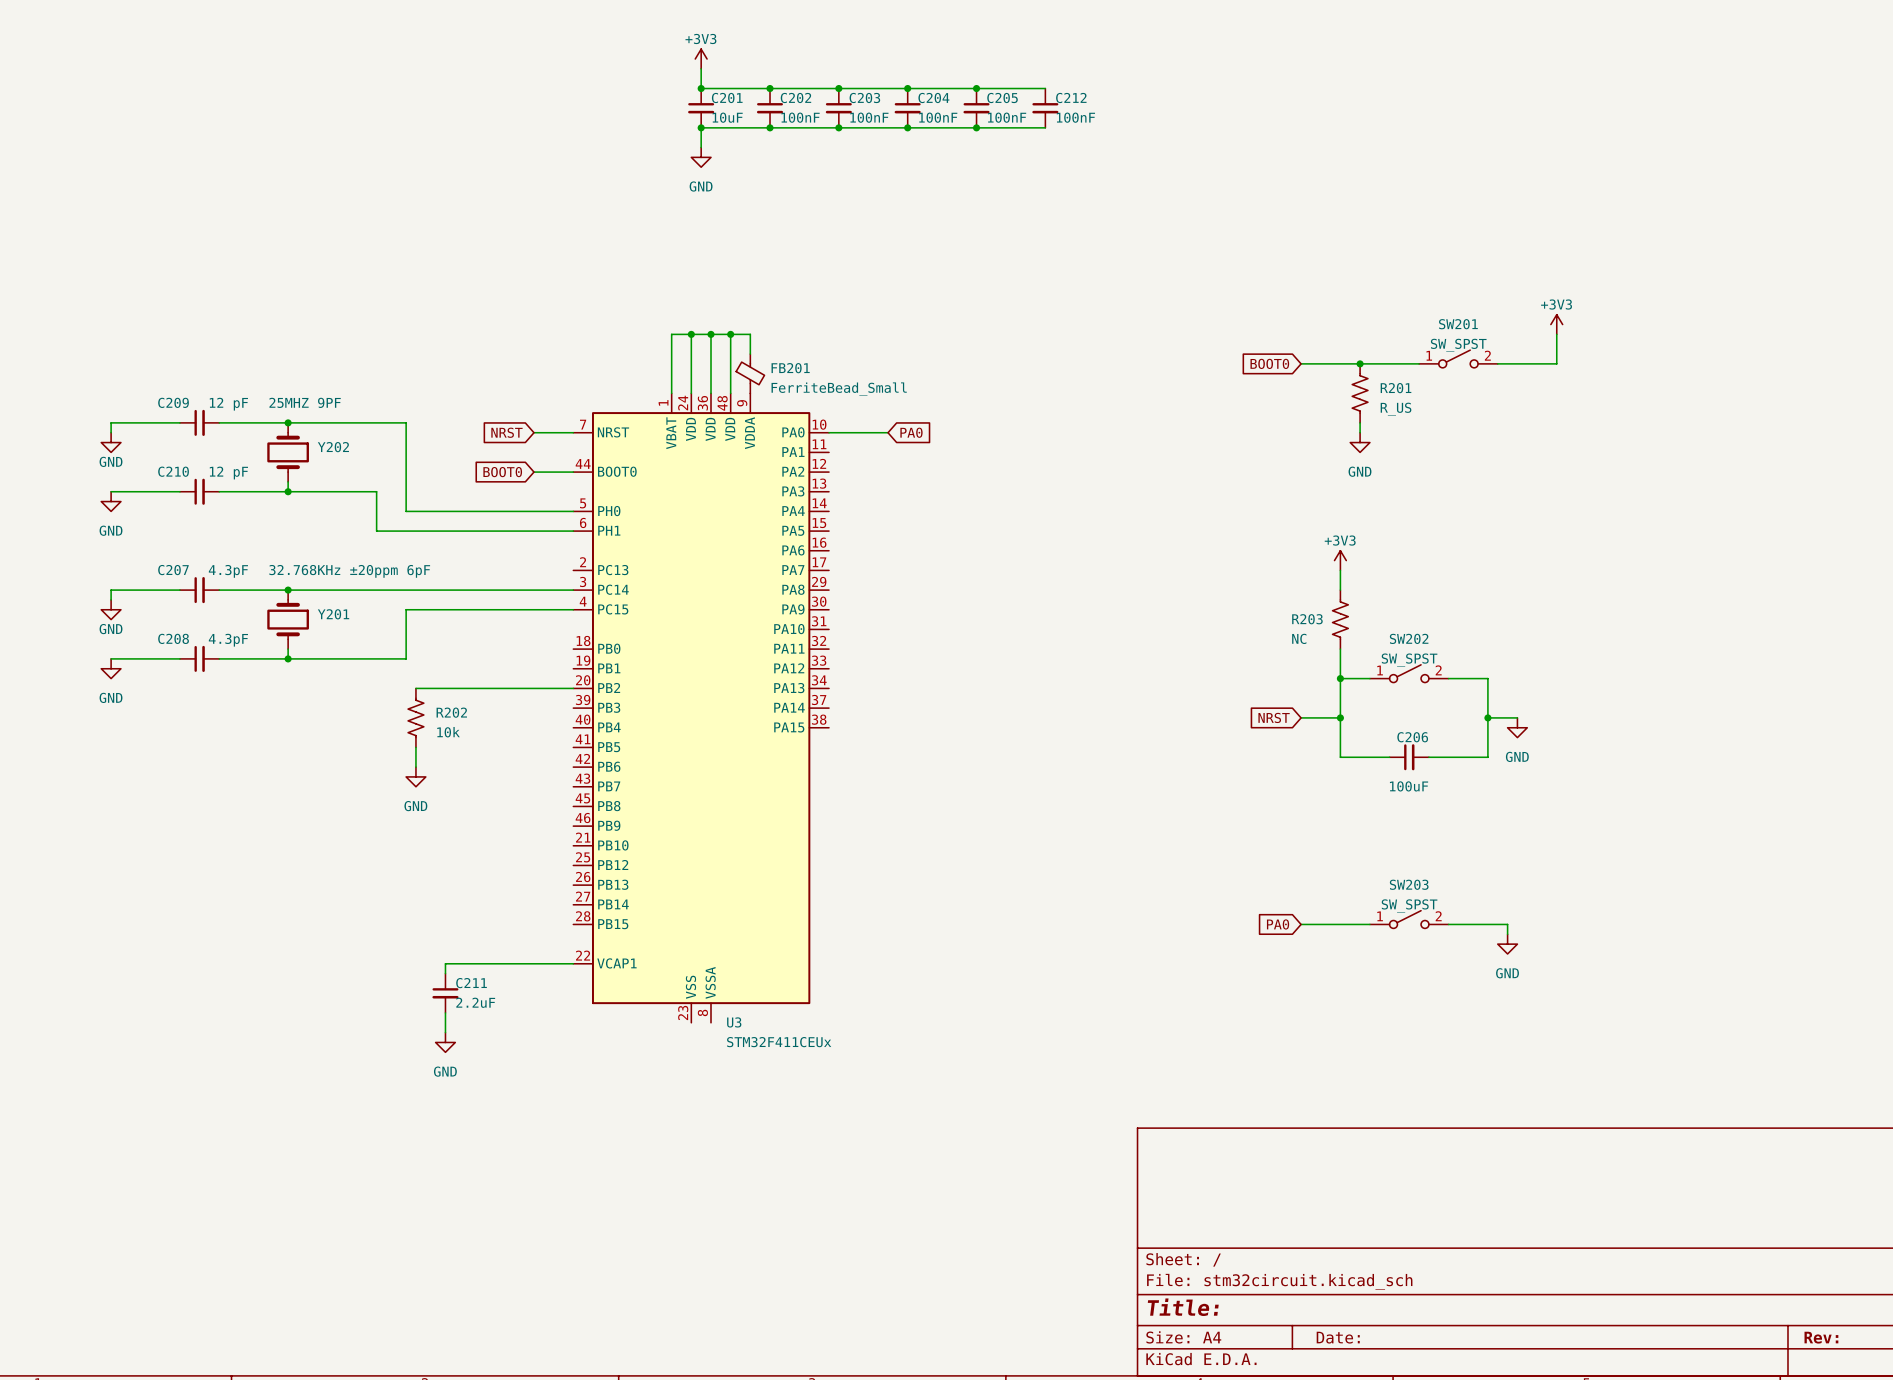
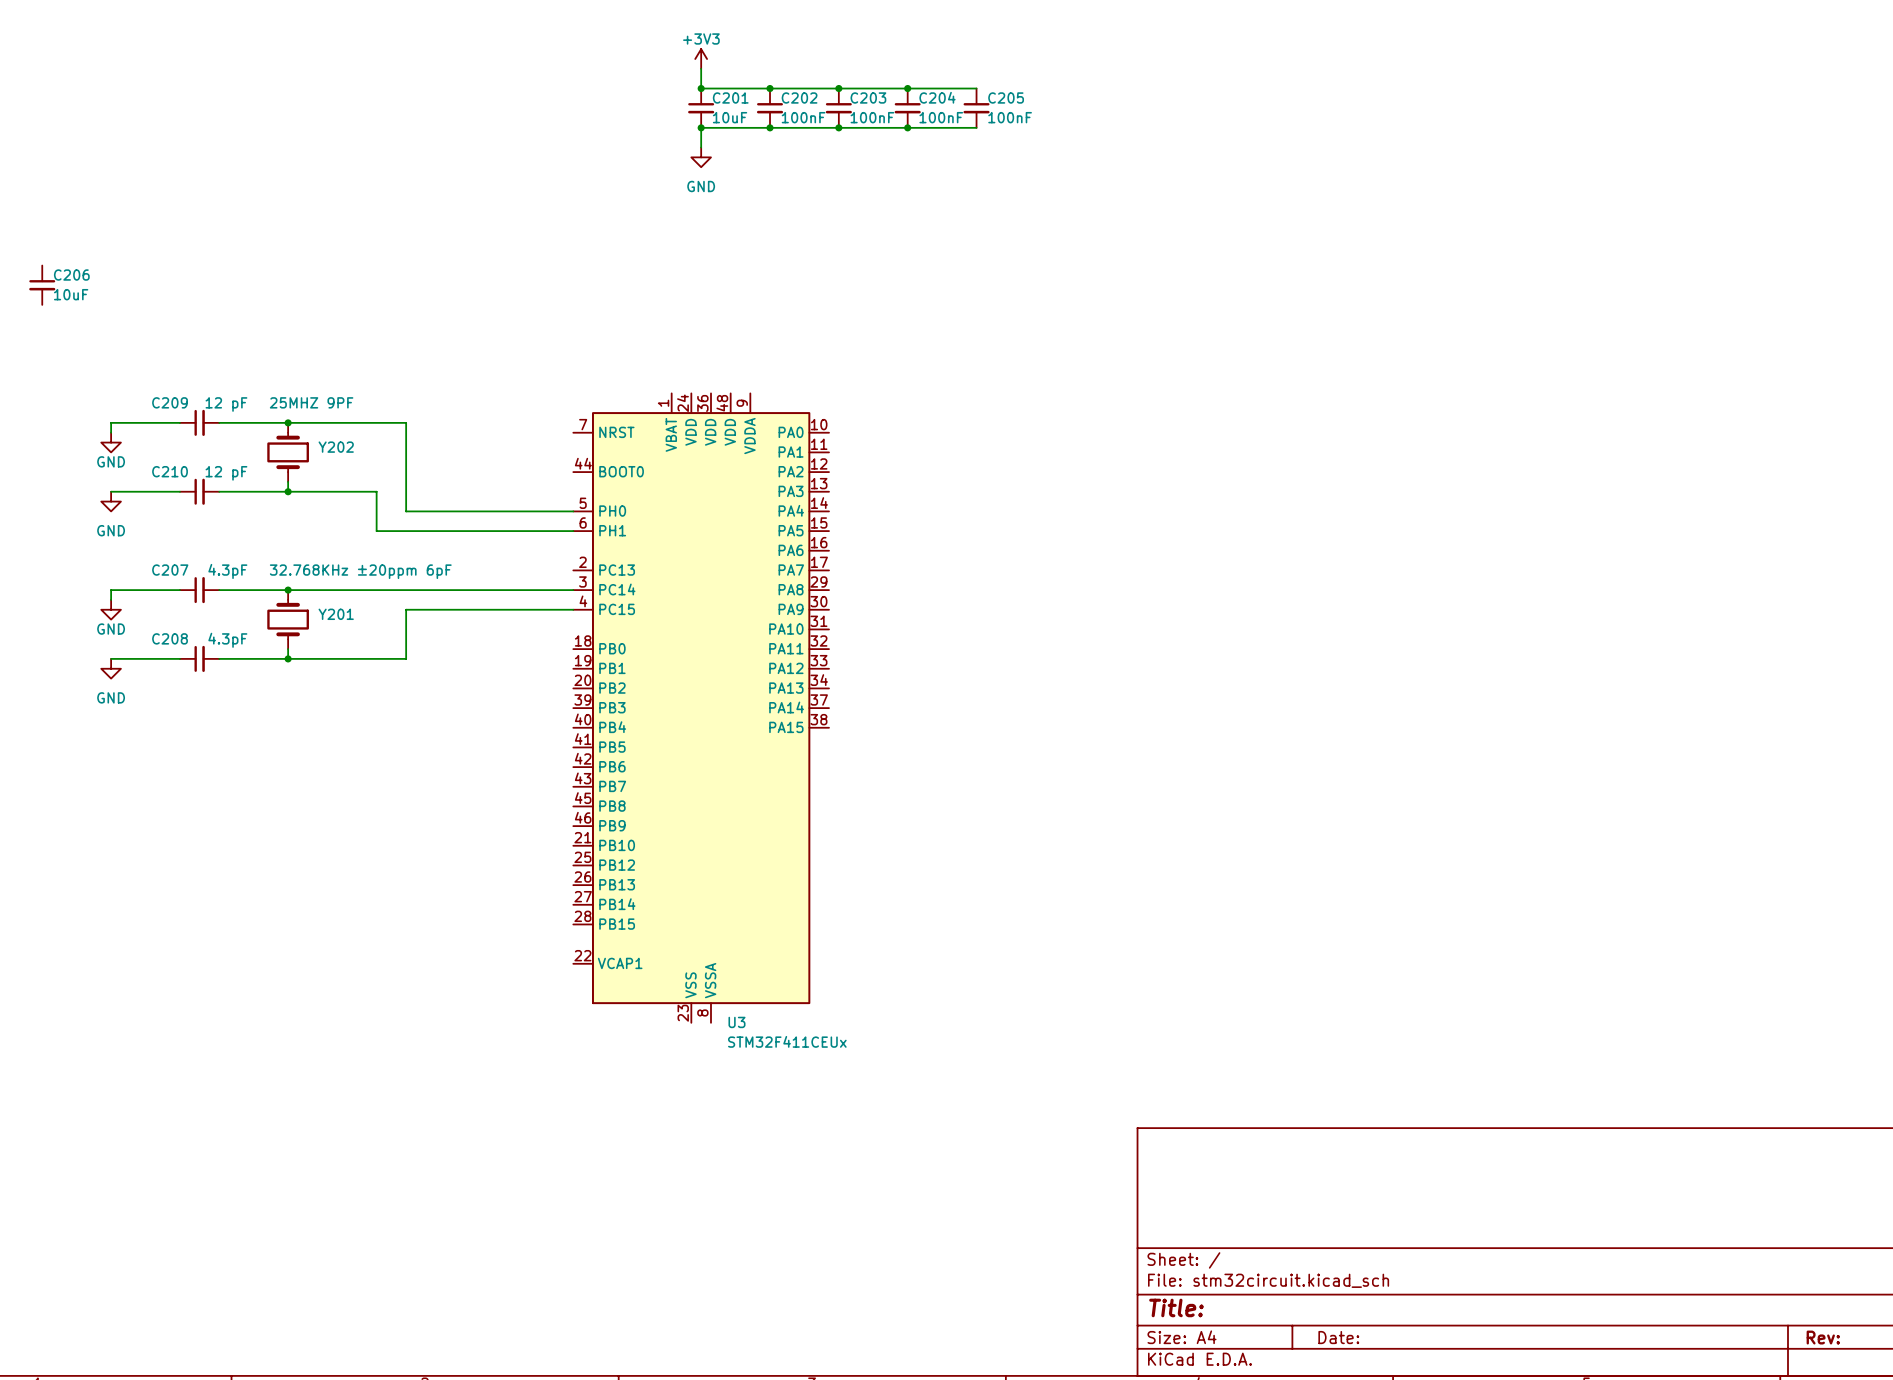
wire: (976, 88) (1045, 88) -> none
junction: (976, 88) -> none
C212: 100nF (1045, 108) -> none
wire: (976, 127) (1045, 127) -> none
junction: (976, 127) -> none
power symbol: +3V3 (1556, 324) -> none
wire: (691, 334) (691, 393) -> none
junction: (691, 334) -> none
wire: (711, 334) (711, 393) -> none
junction: (711, 334) -> none
wire: (730, 334) (730, 393) -> none
junction: (730, 334) -> none
wire: (1556, 334) (1556, 363) (1497, 363) -> none
wire: (750, 354) (750, 334) (671, 334) (671, 393) -> none
SW201: SW_SPST (1458, 358) -> none
global label: BOOT0 (1269, 363) -> none
wire: (1301, 363) (1419, 363) -> none
junction: (1360, 363) -> none
FB201: FerriteBead_Small (750, 373) -> none
R201: R_US (1360, 393) -> none
wire: (1360, 422) (1360, 432) -> none
global label: NRST (506, 432) -> none
wire: (533, 432) (573, 432) -> none
wire: (829, 432) (888, 432) -> none
global label: PA0 (911, 432) -> none
power symbol: GND (1360, 442) -> none
global label: BOOT0 (502, 472) -> none
wire: (533, 472) (573, 472) -> none
power symbol: +3V3 (1340, 560) -> none
wire: (1340, 570) (1340, 590) -> none
R203: NC (1340, 619) -> none
wire: (1340, 649) (1340, 757) (1389, 757) -> none
SW202: SW_SPST (1409, 673) -> none
wire: (1340, 678) (1369, 678) -> none
junction: (1340, 678) -> none
wire: (1448, 678) (1487, 678) (1487, 757) (1428, 757) -> none
wire: (415, 688) (573, 688) -> none
R202: 10k (415, 717) -> none
global label: NRST (1274, 717) -> none
wire: (1301, 717) (1340, 717) -> none
junction: (1340, 717) -> none
wire: (1487, 717) (1517, 717) -> none
junction: (1487, 717) -> none
power symbol: GND (1517, 727) -> none
wire: (415, 747) (415, 767) -> none
C206 rotation: 0° (1409, 757) -> 90° clockwise (42, 285)
C206 position: (1409, 757) -> (42, 285)
power symbol: GND (415, 776) -> none
C206 value: 100uF (1409, 786) -> 10uF (71, 294)
SW203: SW_SPST (1409, 919) -> none
global label: PA0 (1278, 924) -> none
wire: (1301, 924) (1369, 924) -> none
wire: (1448, 924) (1507, 924) (1507, 934) -> none
power symbol: GND (1507, 944) -> none
wire: (573, 963) (445, 963) (445, 973) -> none
C211: 2.2uF (445, 993) -> none
wire: (445, 1012) (445, 1032) -> none
power symbol: GND (445, 1042) -> none

